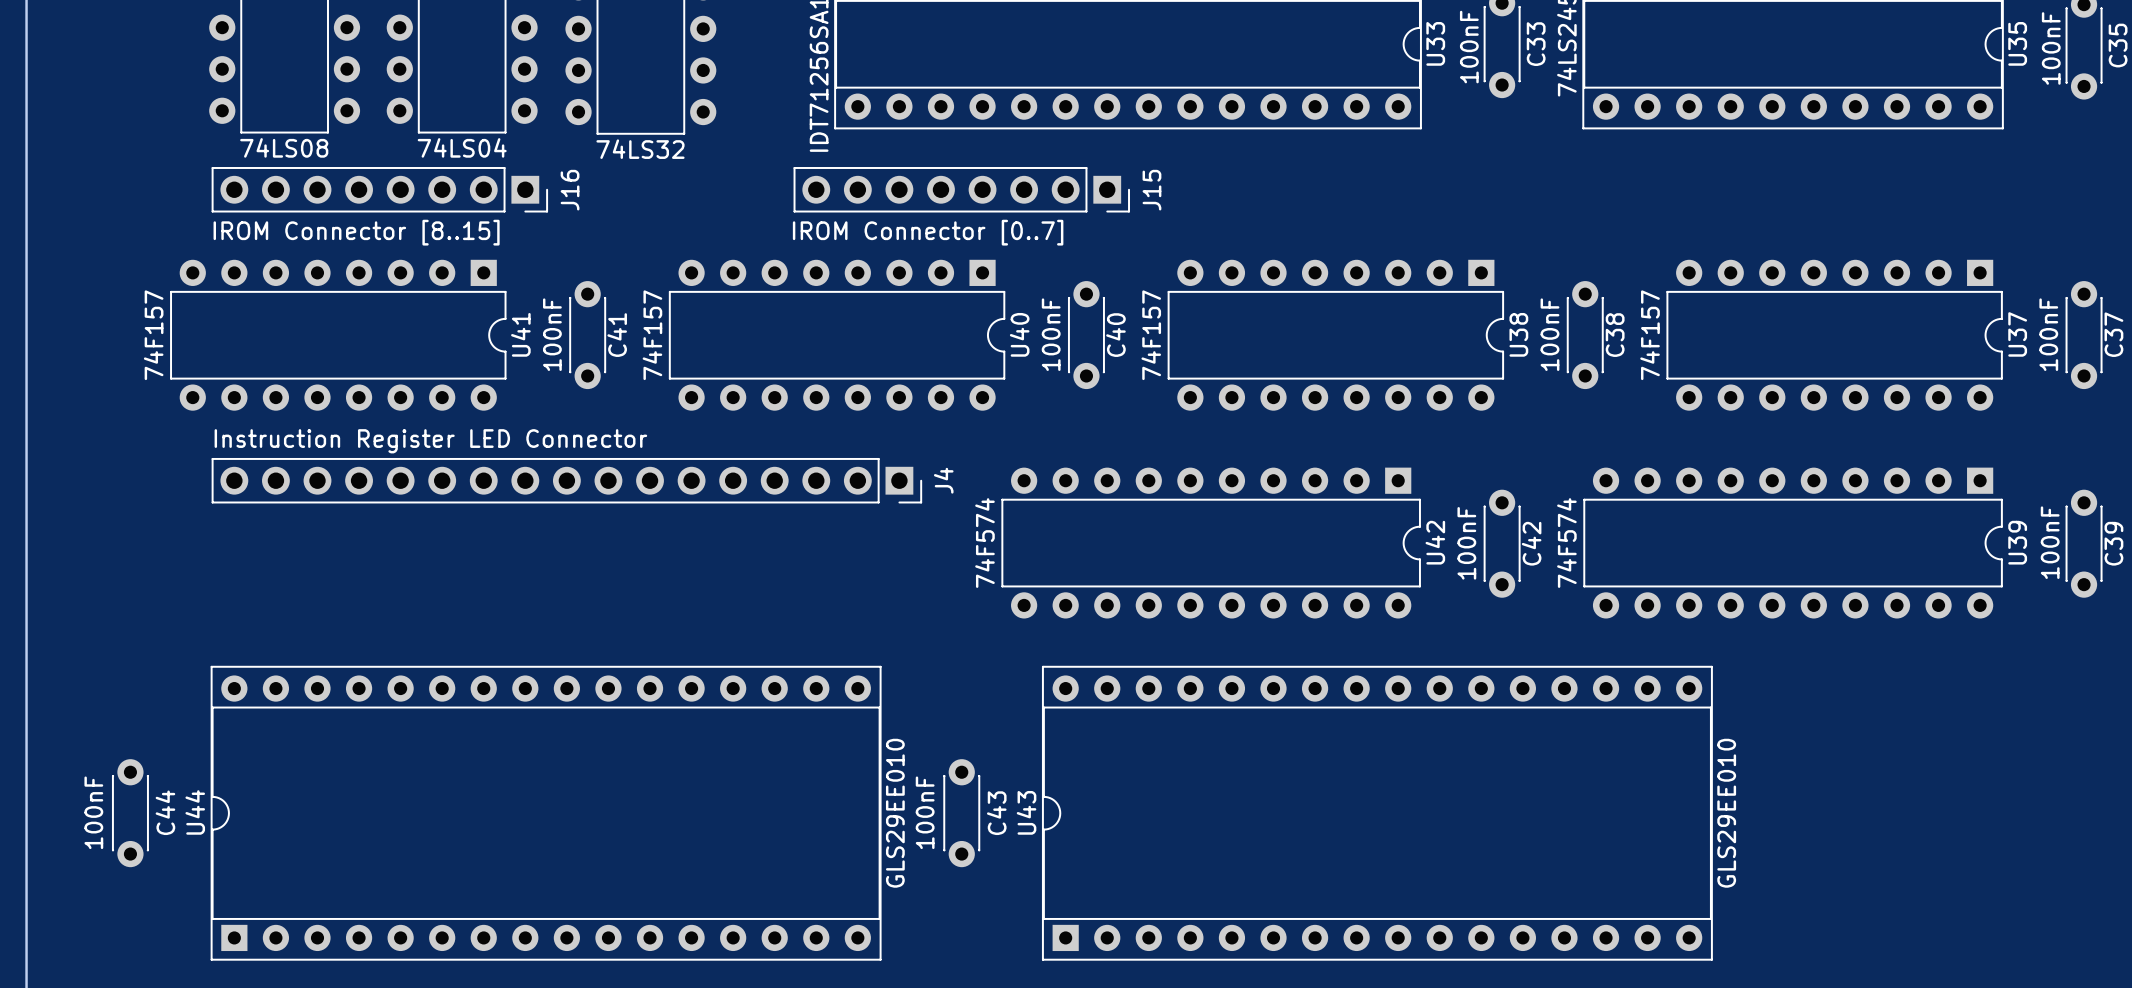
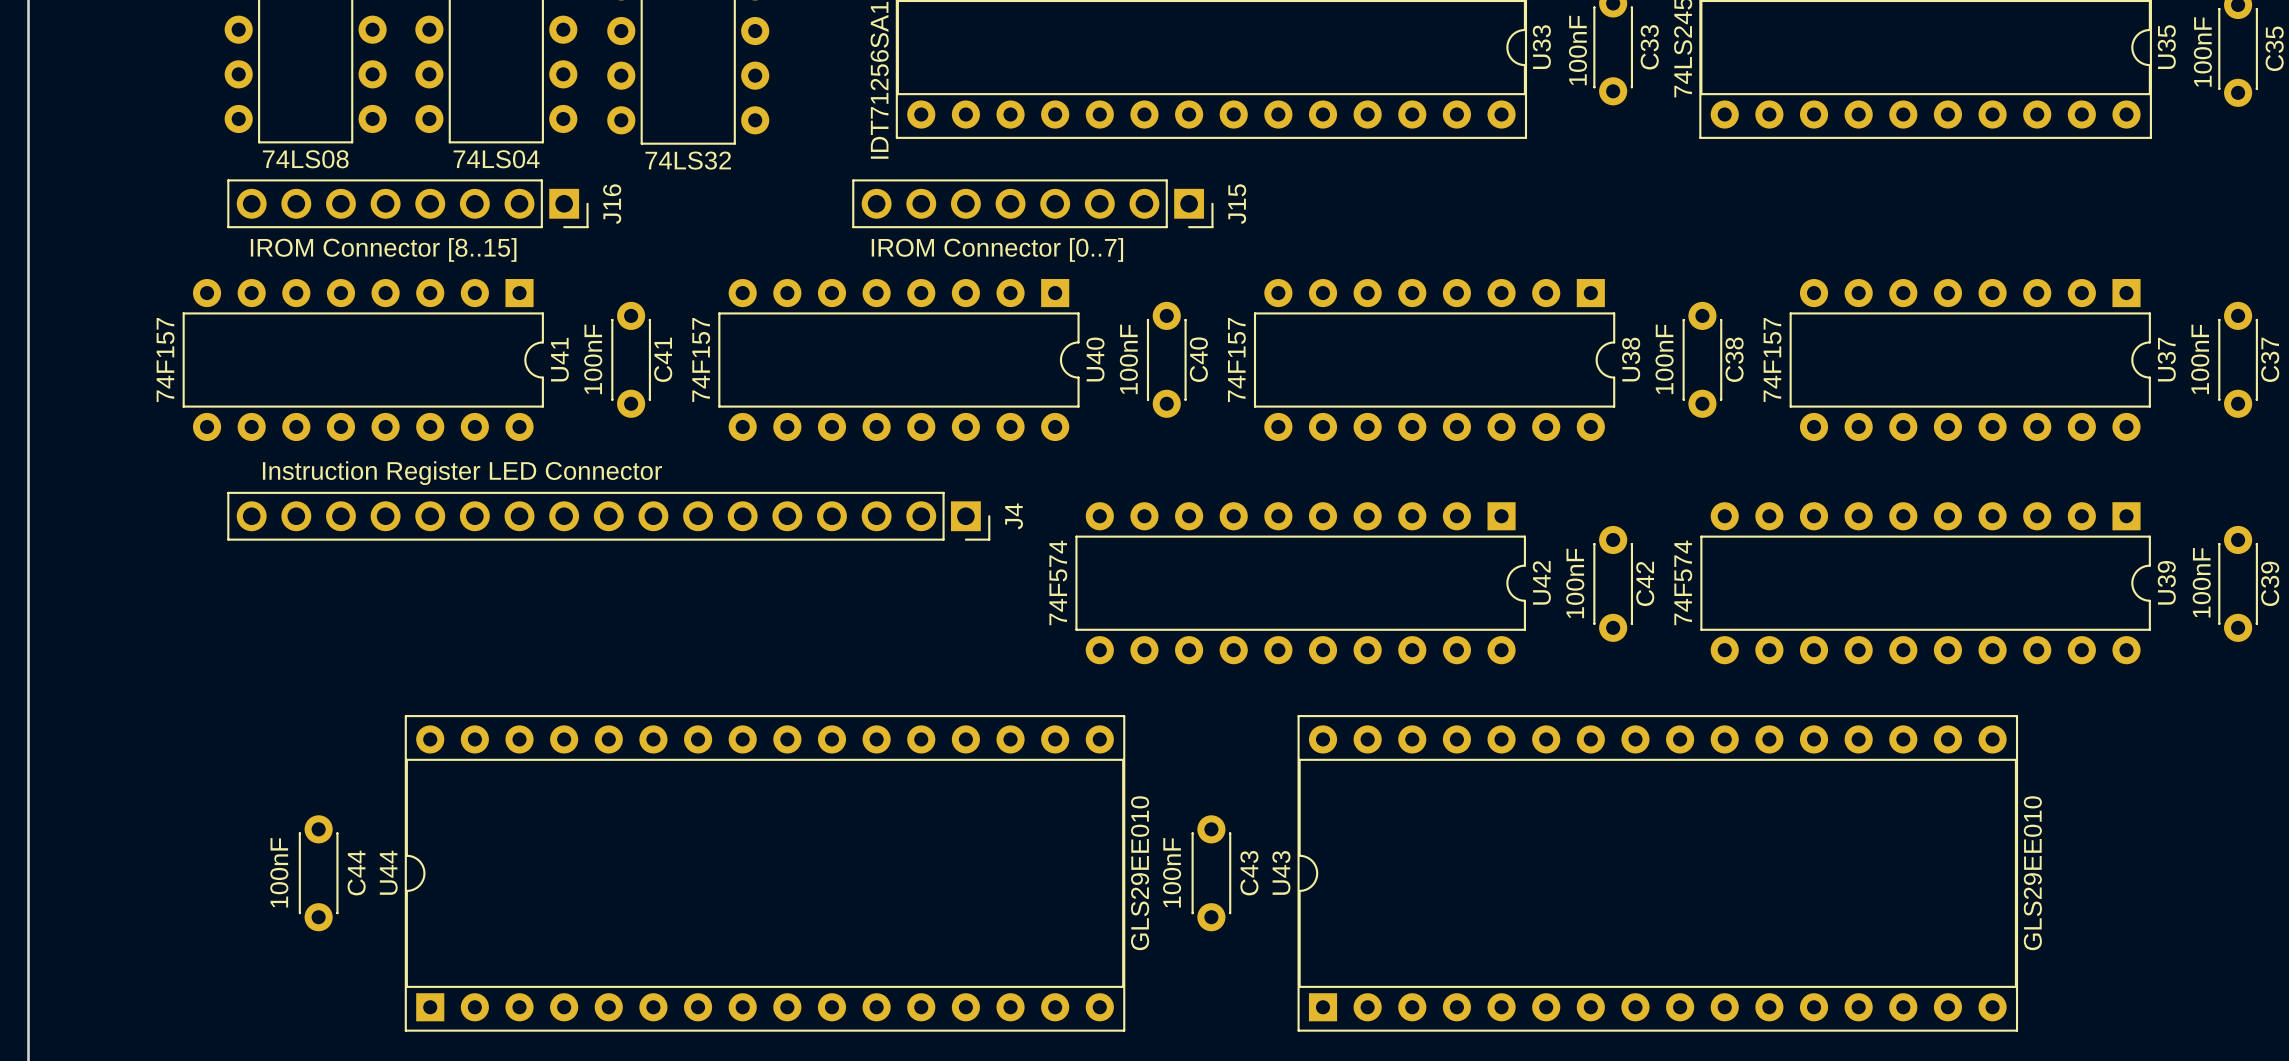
C44 position: (130, 813) -> (318, 873)
U44 position: (546, 813) -> (765, 873)
C43 position: (961, 813) -> (1211, 873)
U43 position: (1377, 813) -> (1657, 873)

